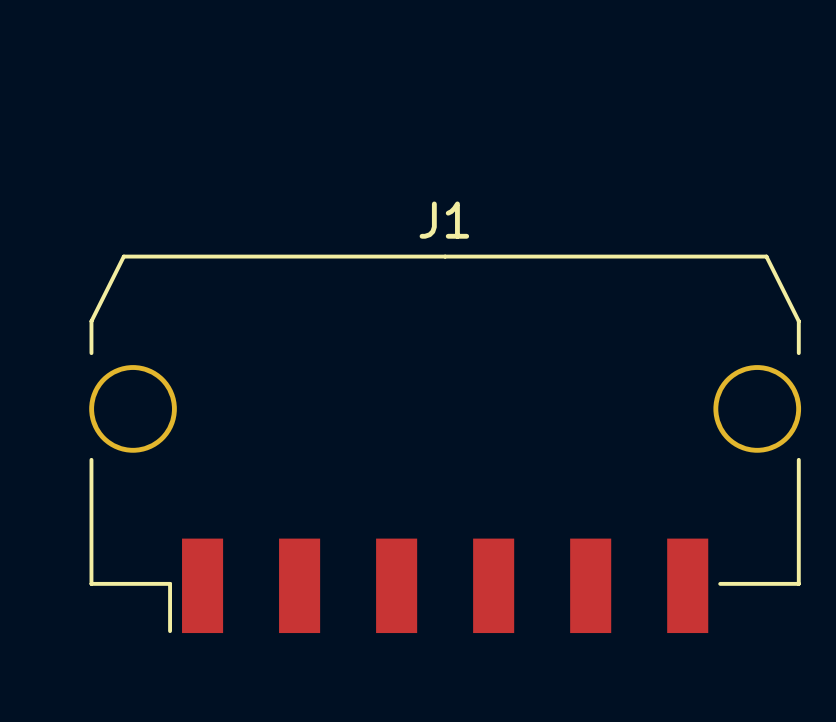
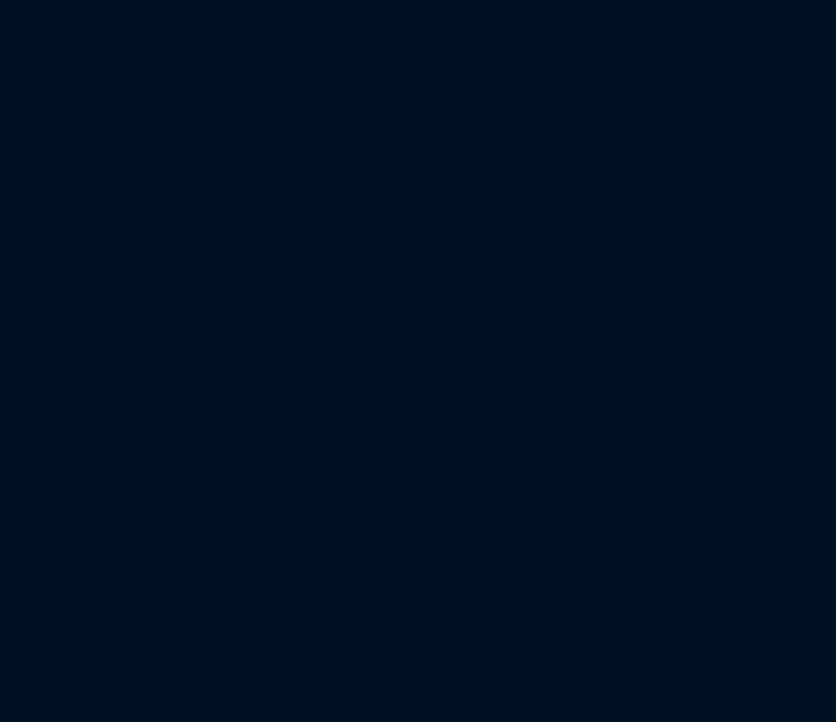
J1: (445, 443) -> none

